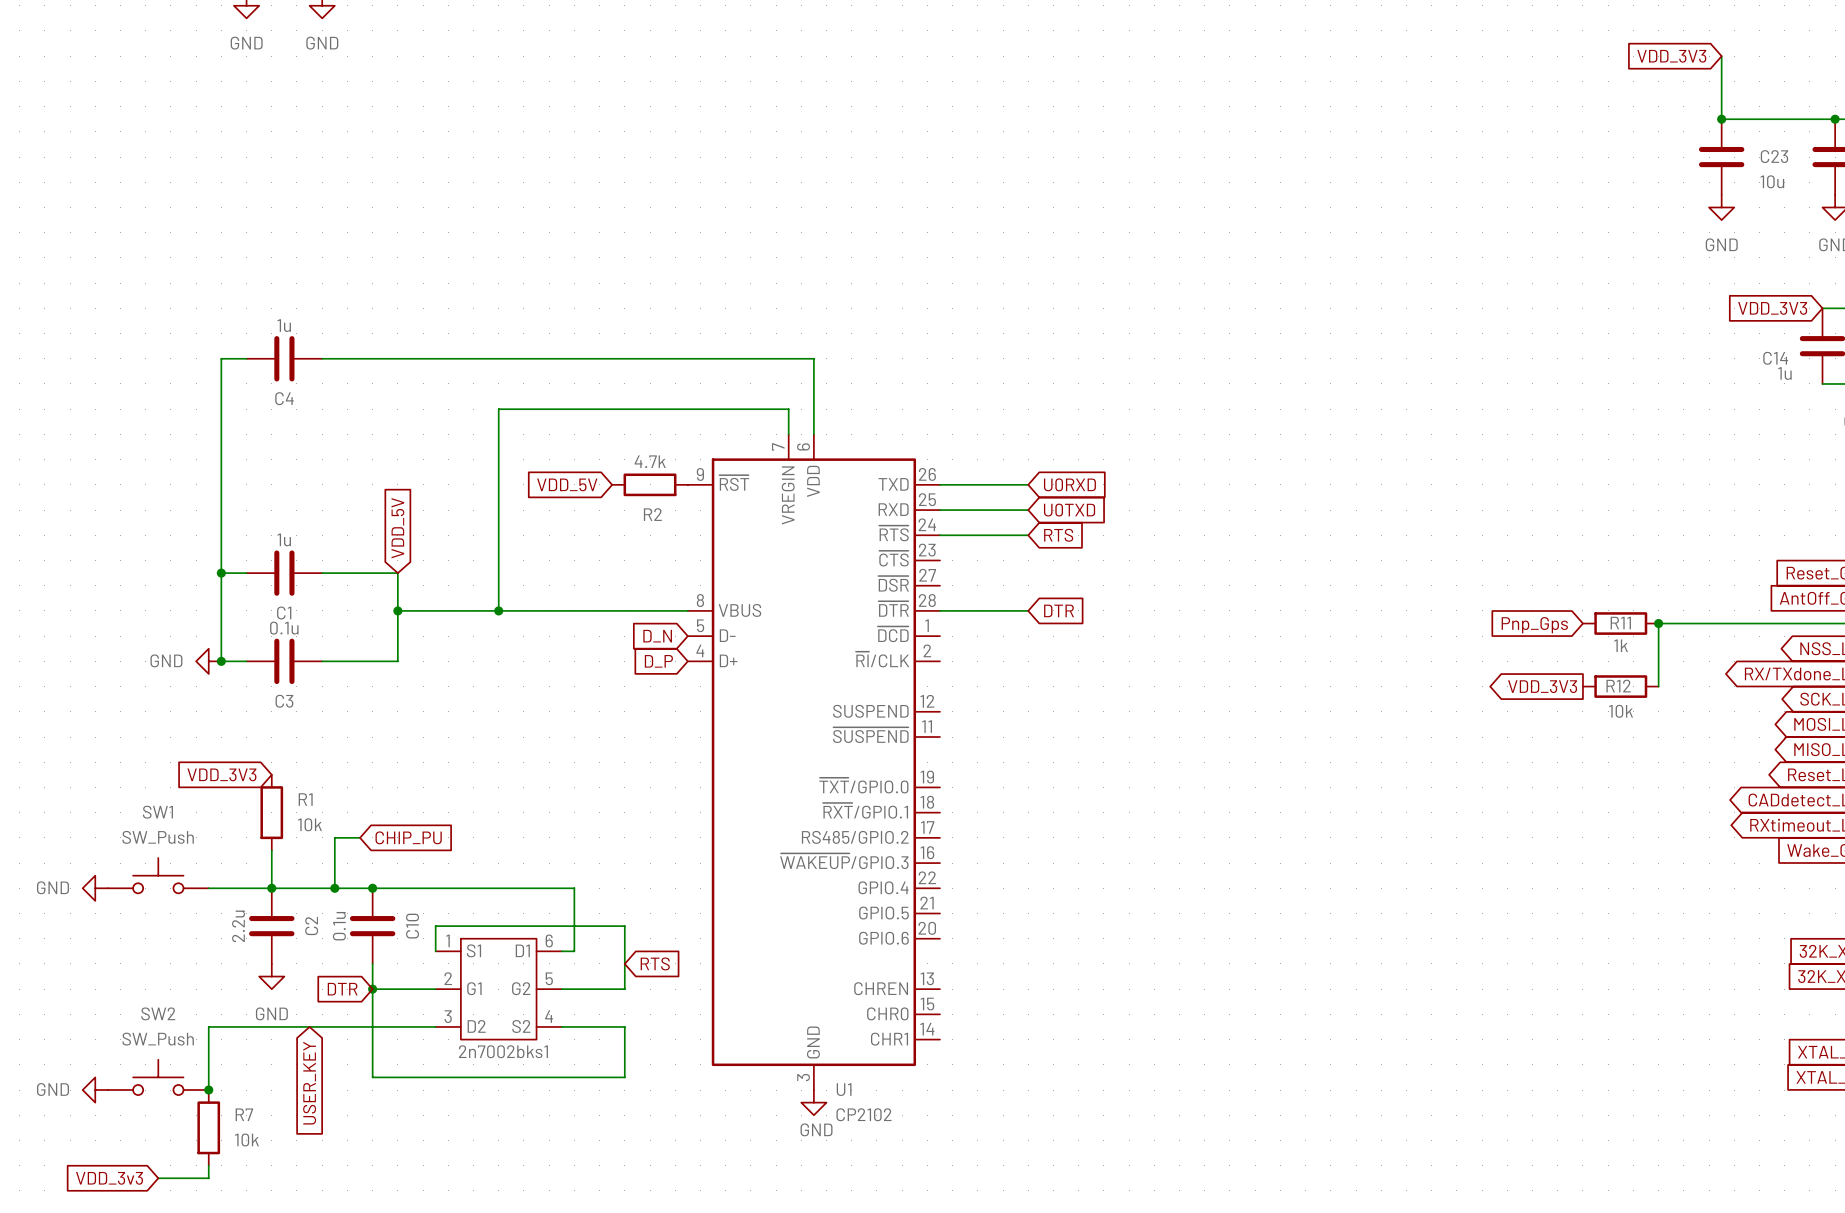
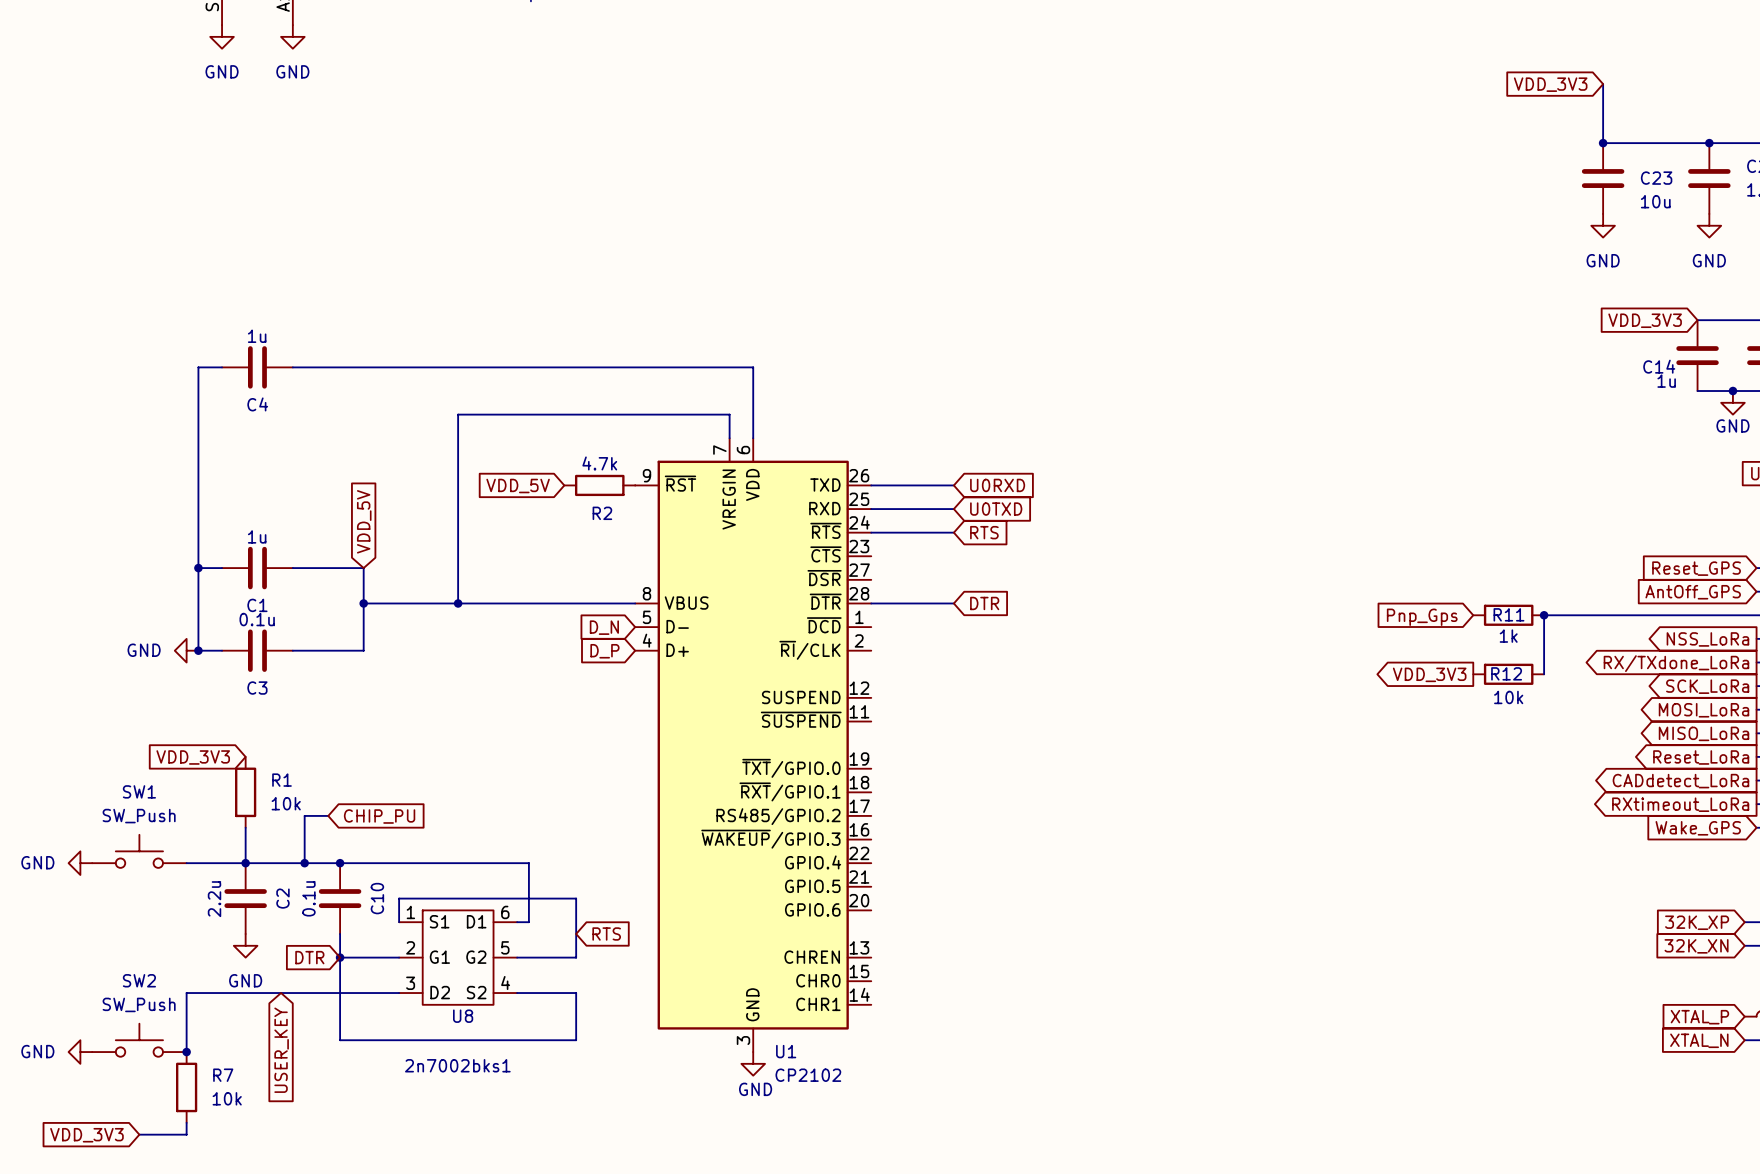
2n7002bks1 name: 2n7002bks1 (503, 1051) -> U8 (463, 1016)
2n7002bks1 value: none -> 2n7002bks1 (457, 1065)
global label: VDD_3v3 (109, 1178) -> VDD_3V3 (86, 1135)

